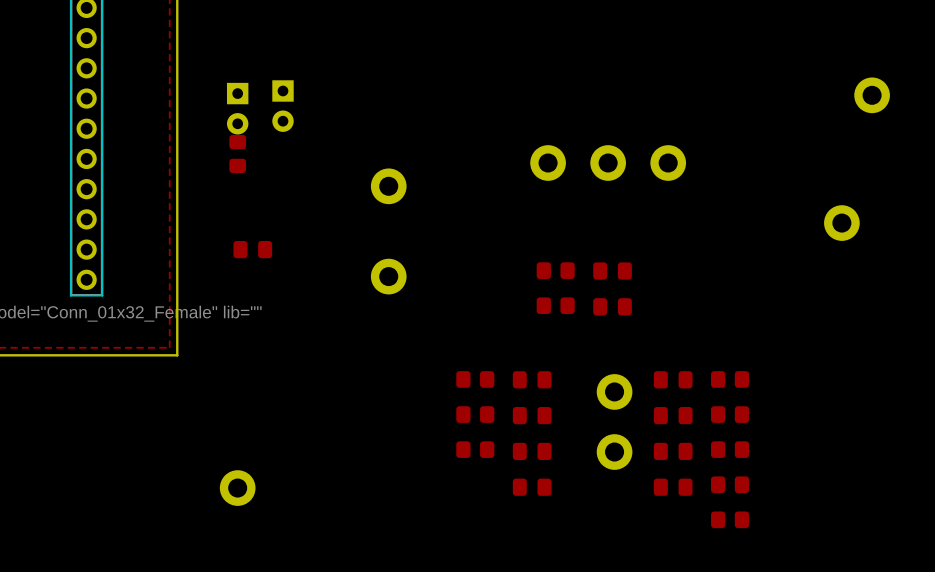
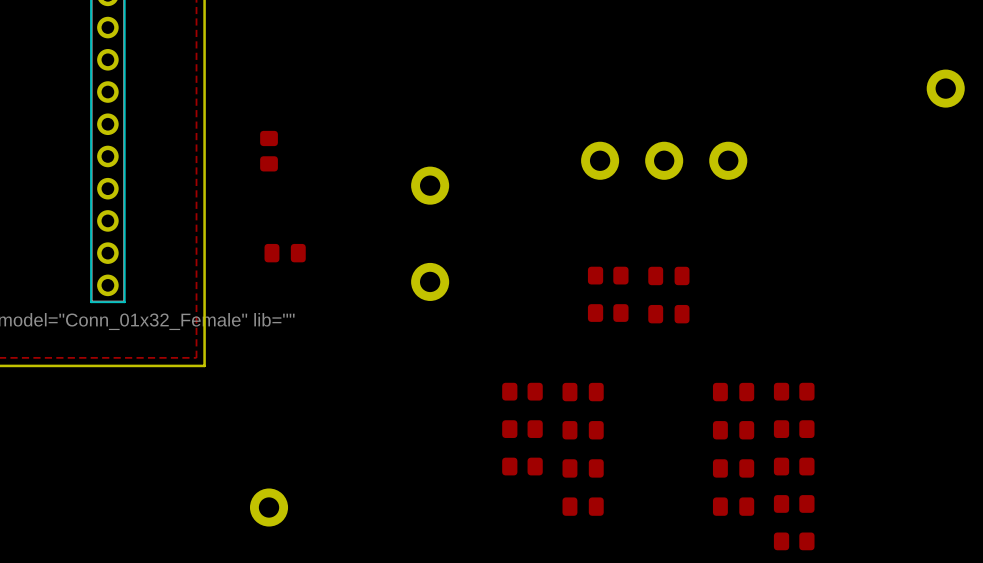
part: (283, 106) -> none
part: (237, 108) -> none
part: (841, 223) -> none
part: (614, 391) -> none
part: (614, 452) -> none

